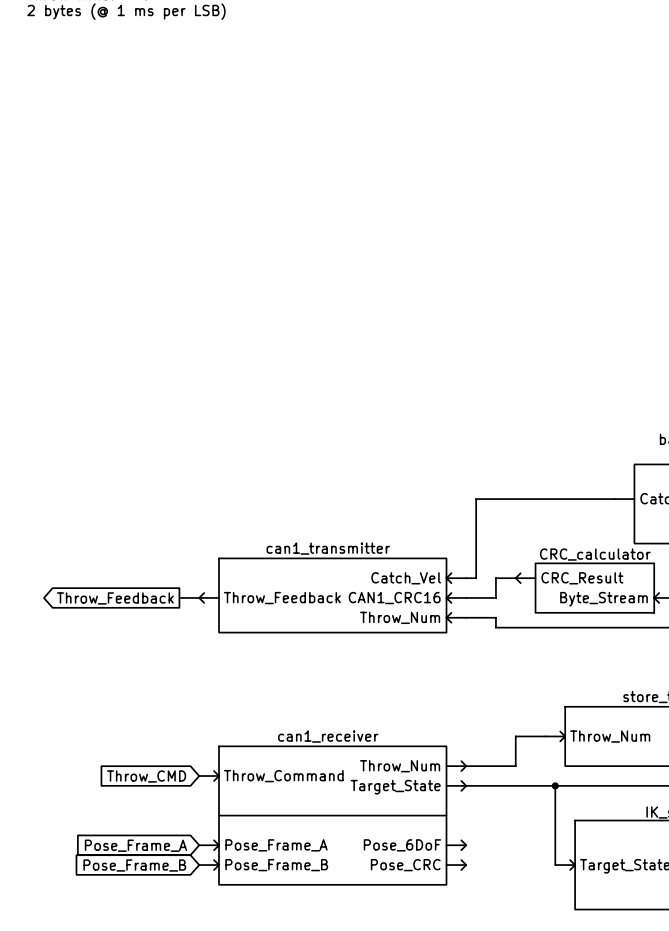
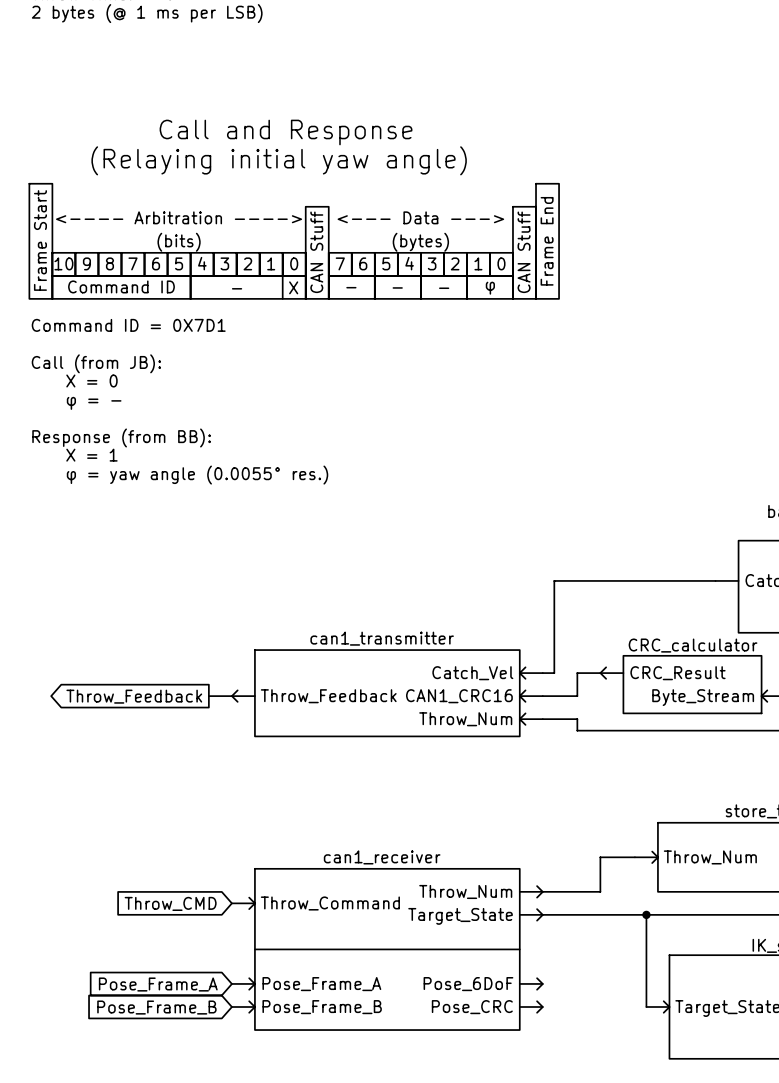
text: none -> Call and Response (286, 132)
text: none -> (Relaying initial yaw angle) (279, 160)
part: none -> (294, 241)
line: none -> (282, 275) (282, 298)
text: none -> X (293, 287)
text: none -> - (351, 287)
text: none -> - (397, 287)
text: none -> - (444, 288)
text: none -> φ (490, 288)
text: none -> - (237, 288)
text: none -> Command ID = 0X7D1 (128, 325)
text: none -> Call (from JB): (96, 363)
text: none -> X = 0 (91, 380)
text: none -> φ = - (94, 403)
text: none -> Response (from BB): (121, 437)
text: none -> X = 1 (91, 455)
text: none -> φ = yaw angle (0.0055° res.) (197, 475)

